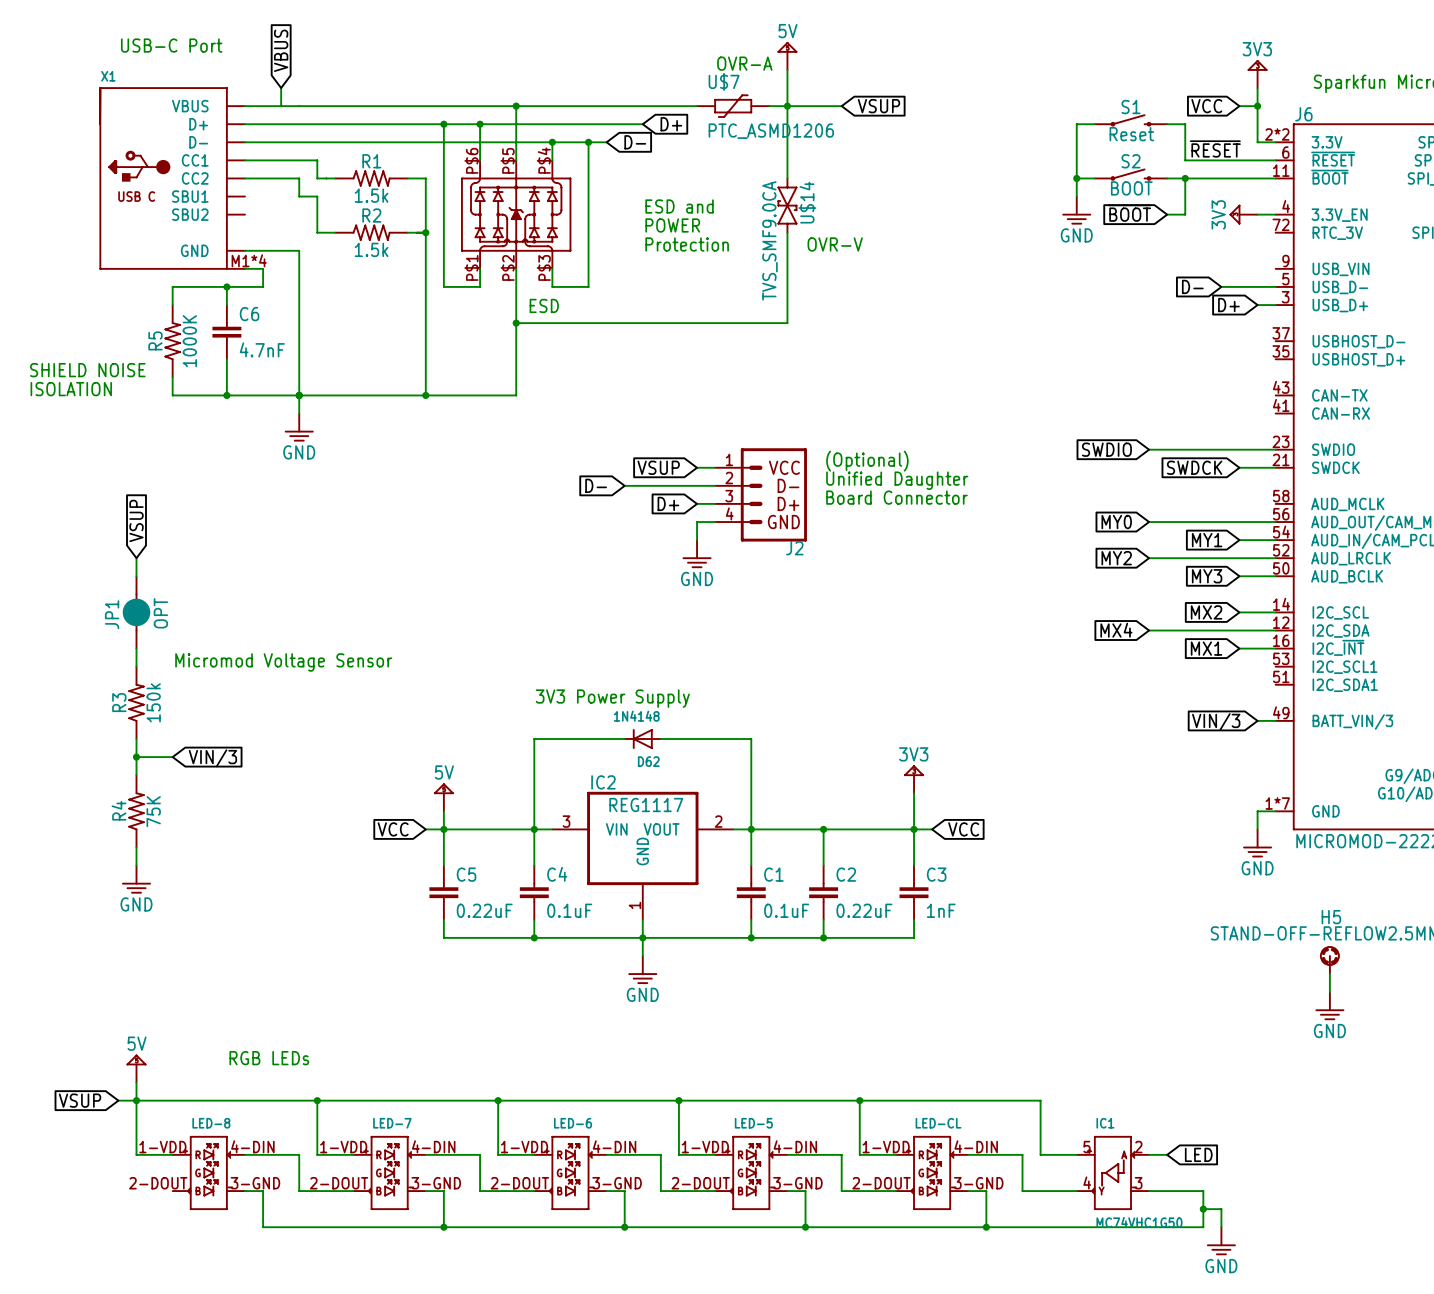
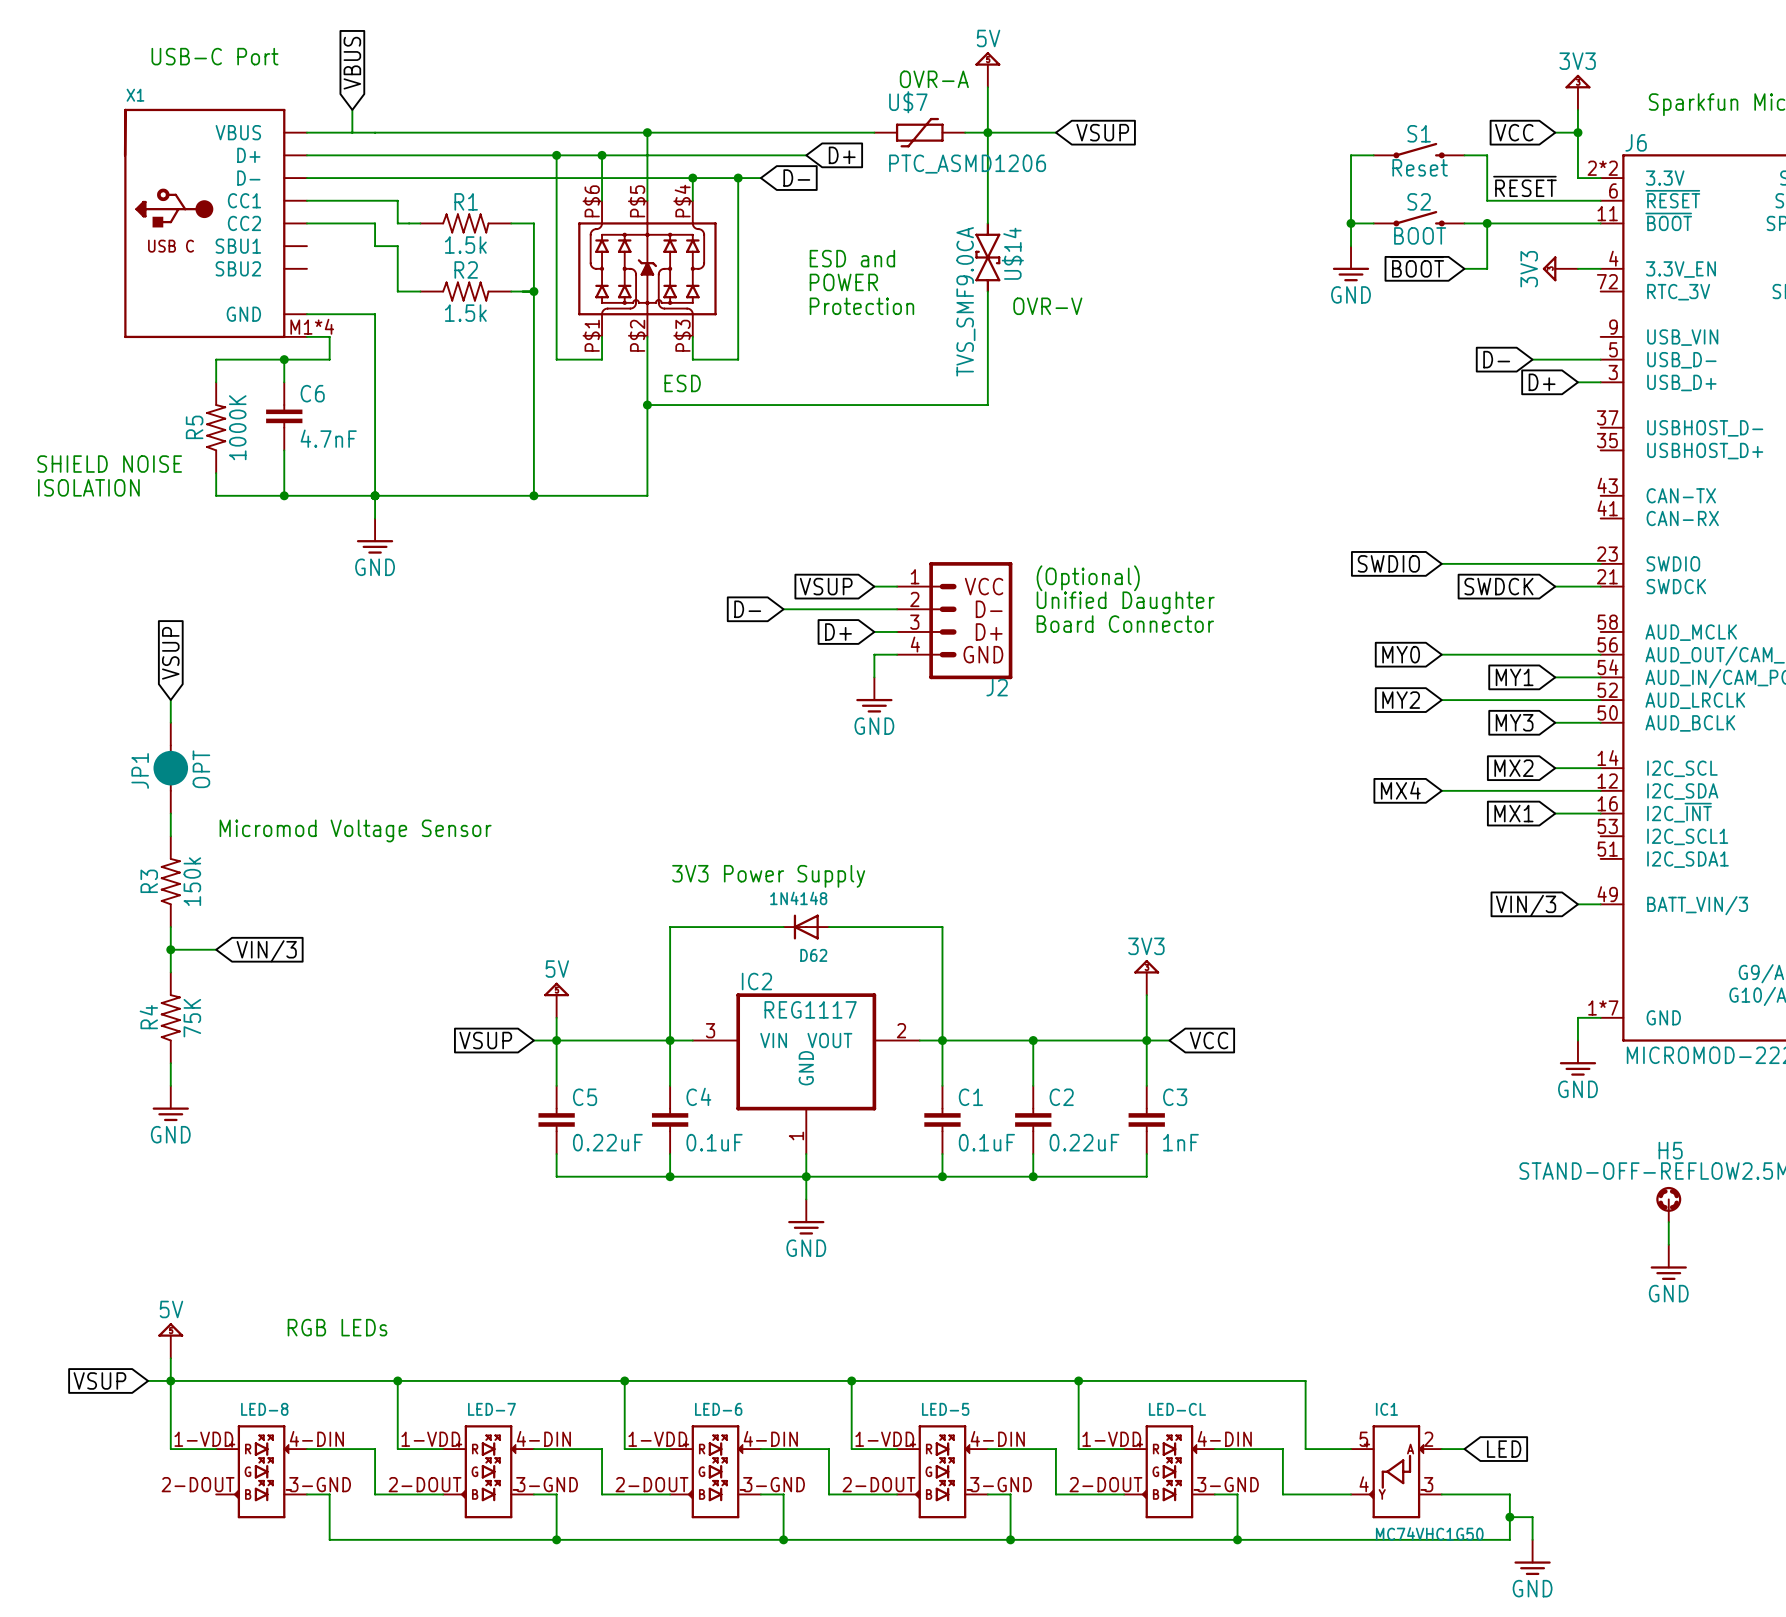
global label: VCC (393, 829) -> VSUP (485, 1040)

